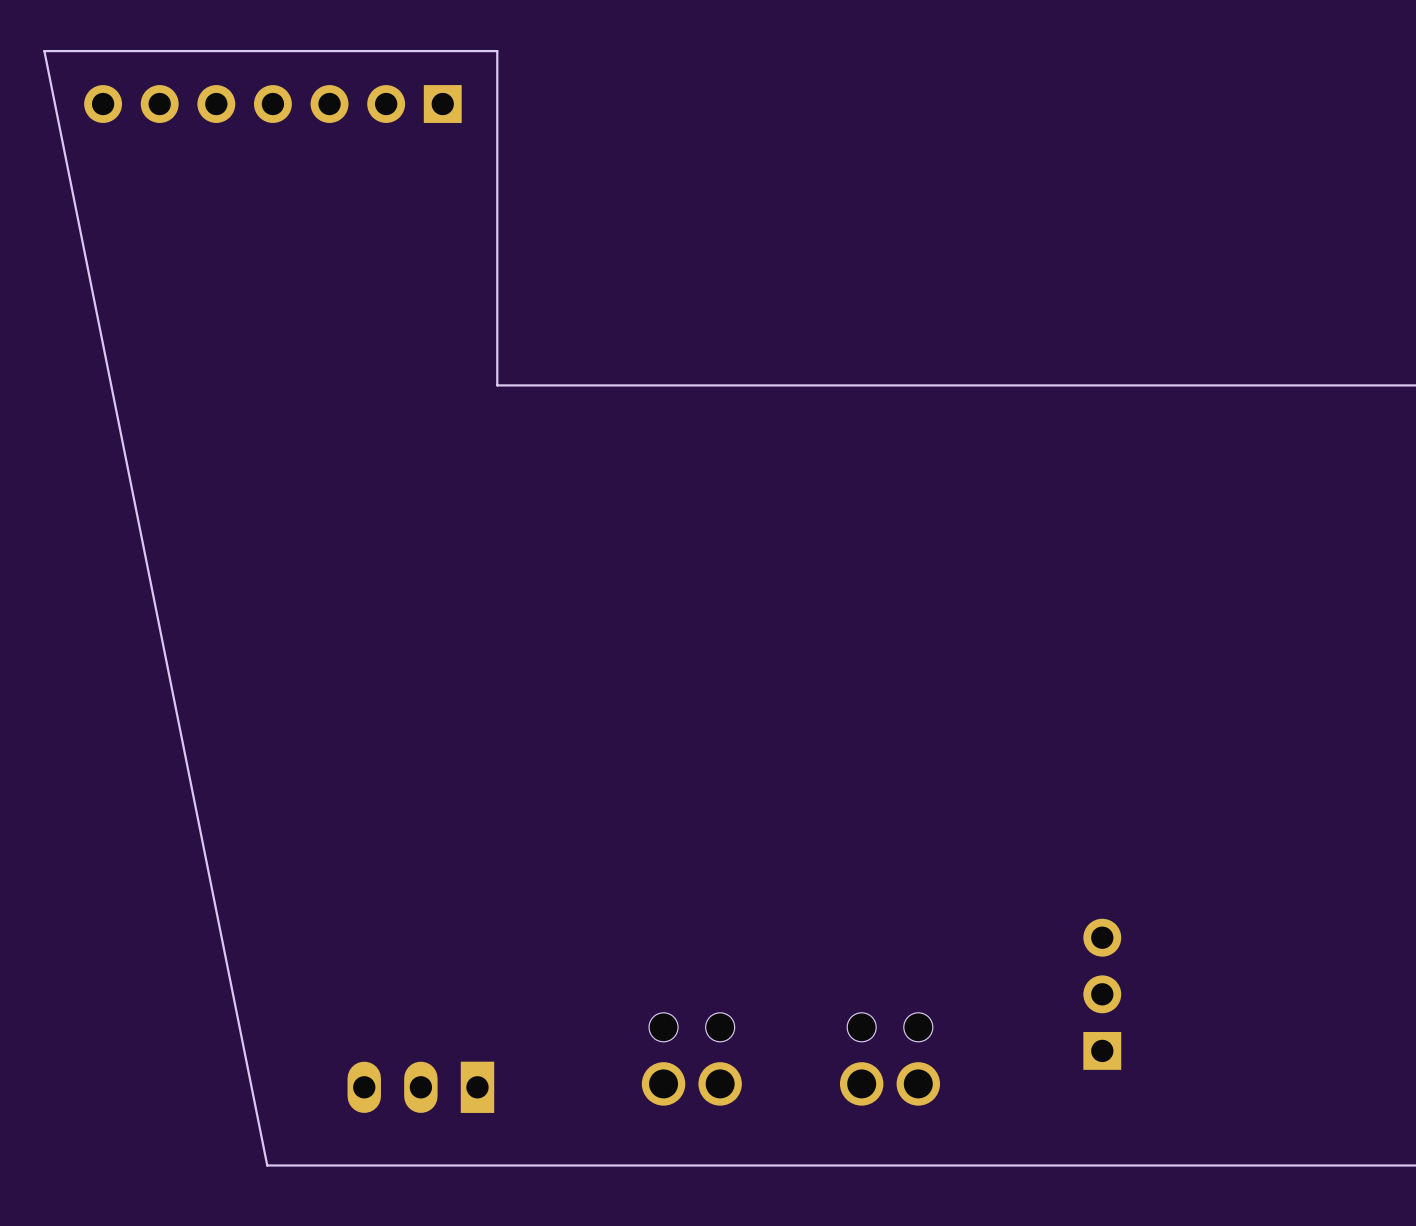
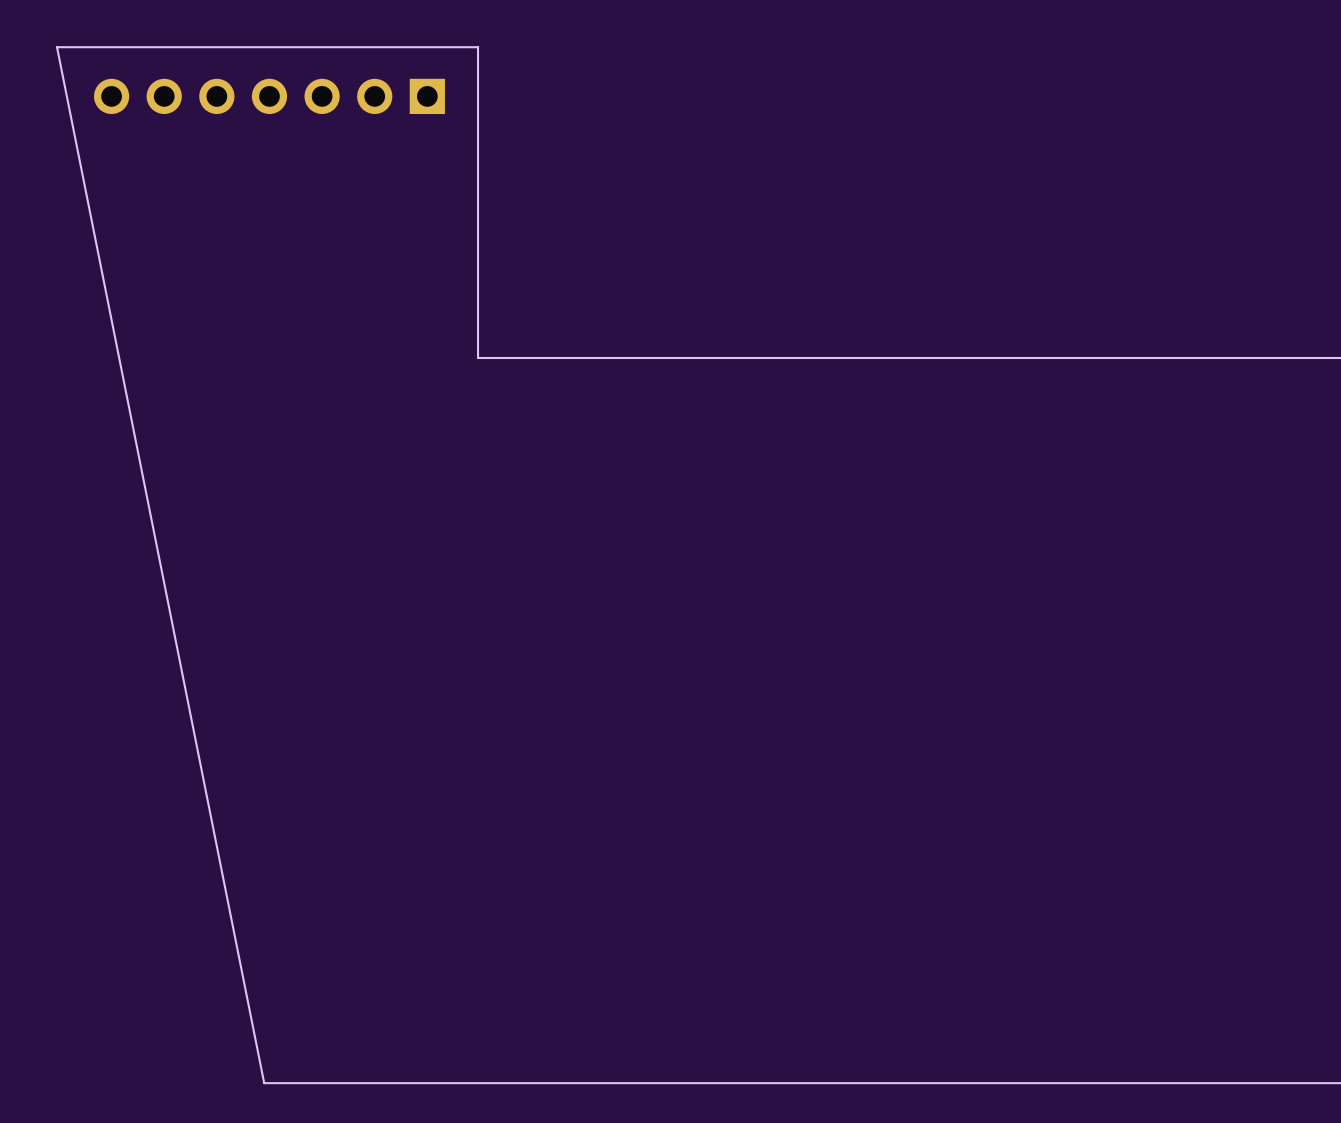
part: (1102, 994) -> none
part: (691, 1059) -> none
part: (890, 1059) -> none
part: (420, 1087) -> none

